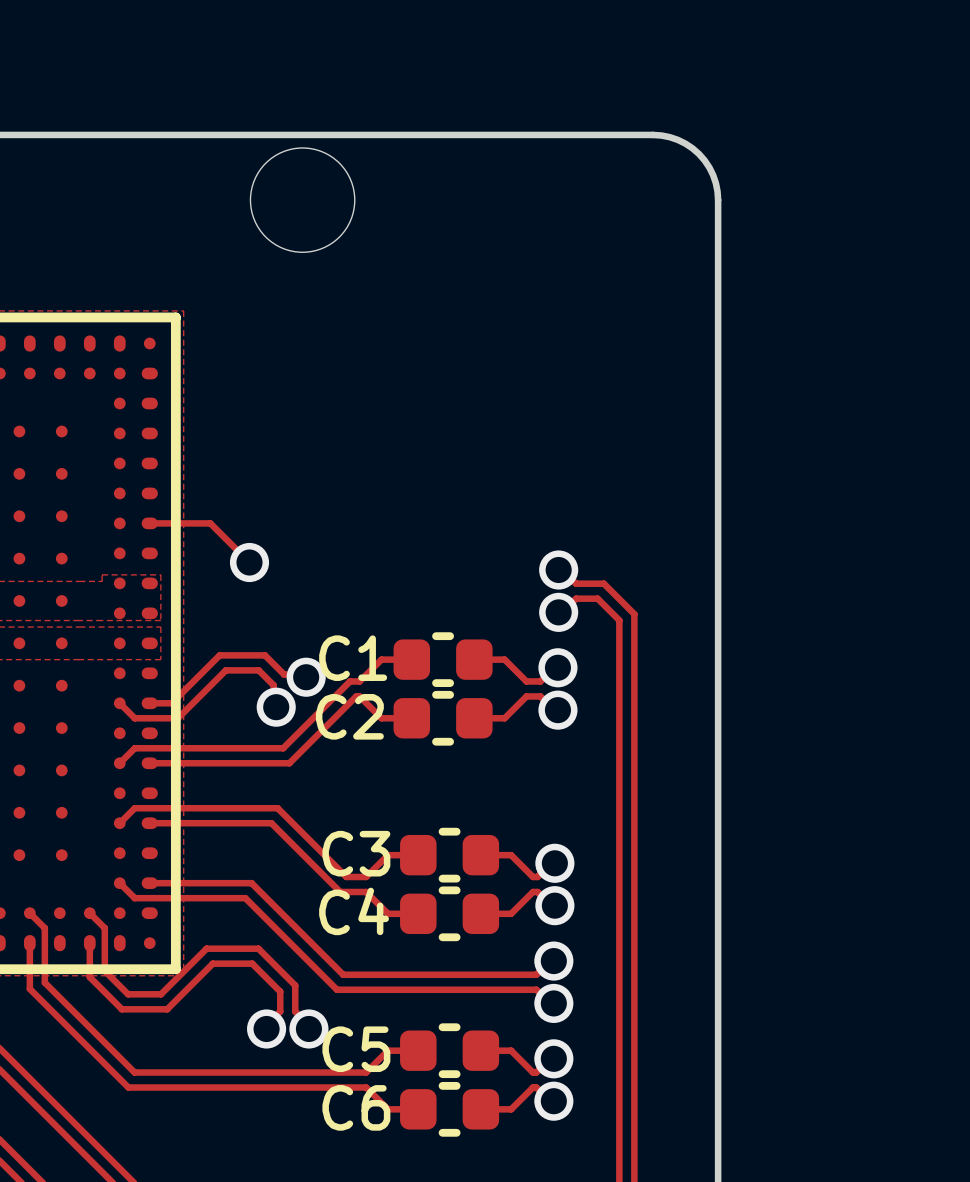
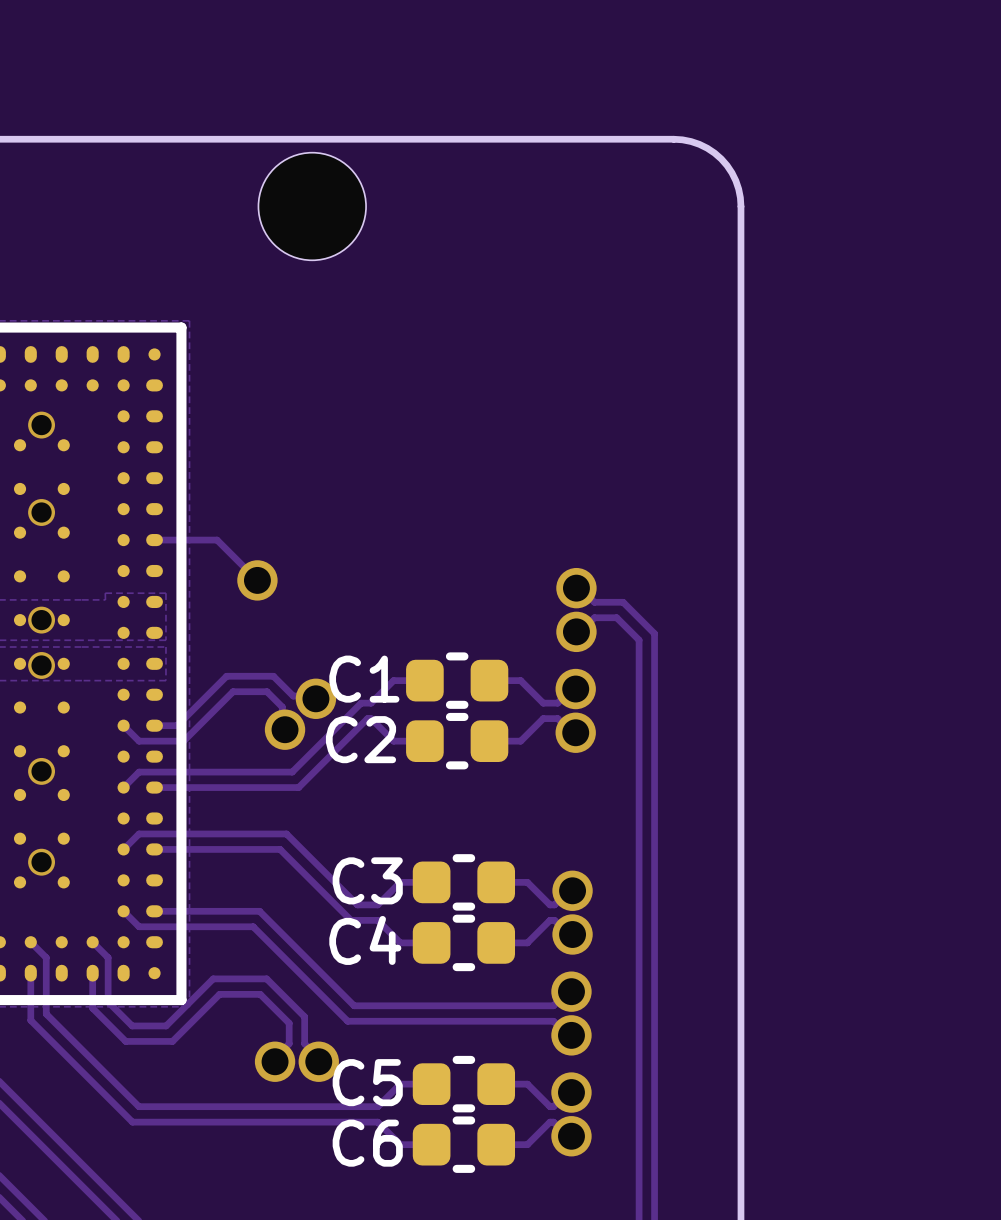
via: none -> (41, 425)
via: none -> (41, 512)
via: none -> (41, 620)
via: none -> (41, 665)
via: none -> (41, 771)
via: none -> (41, 862)

